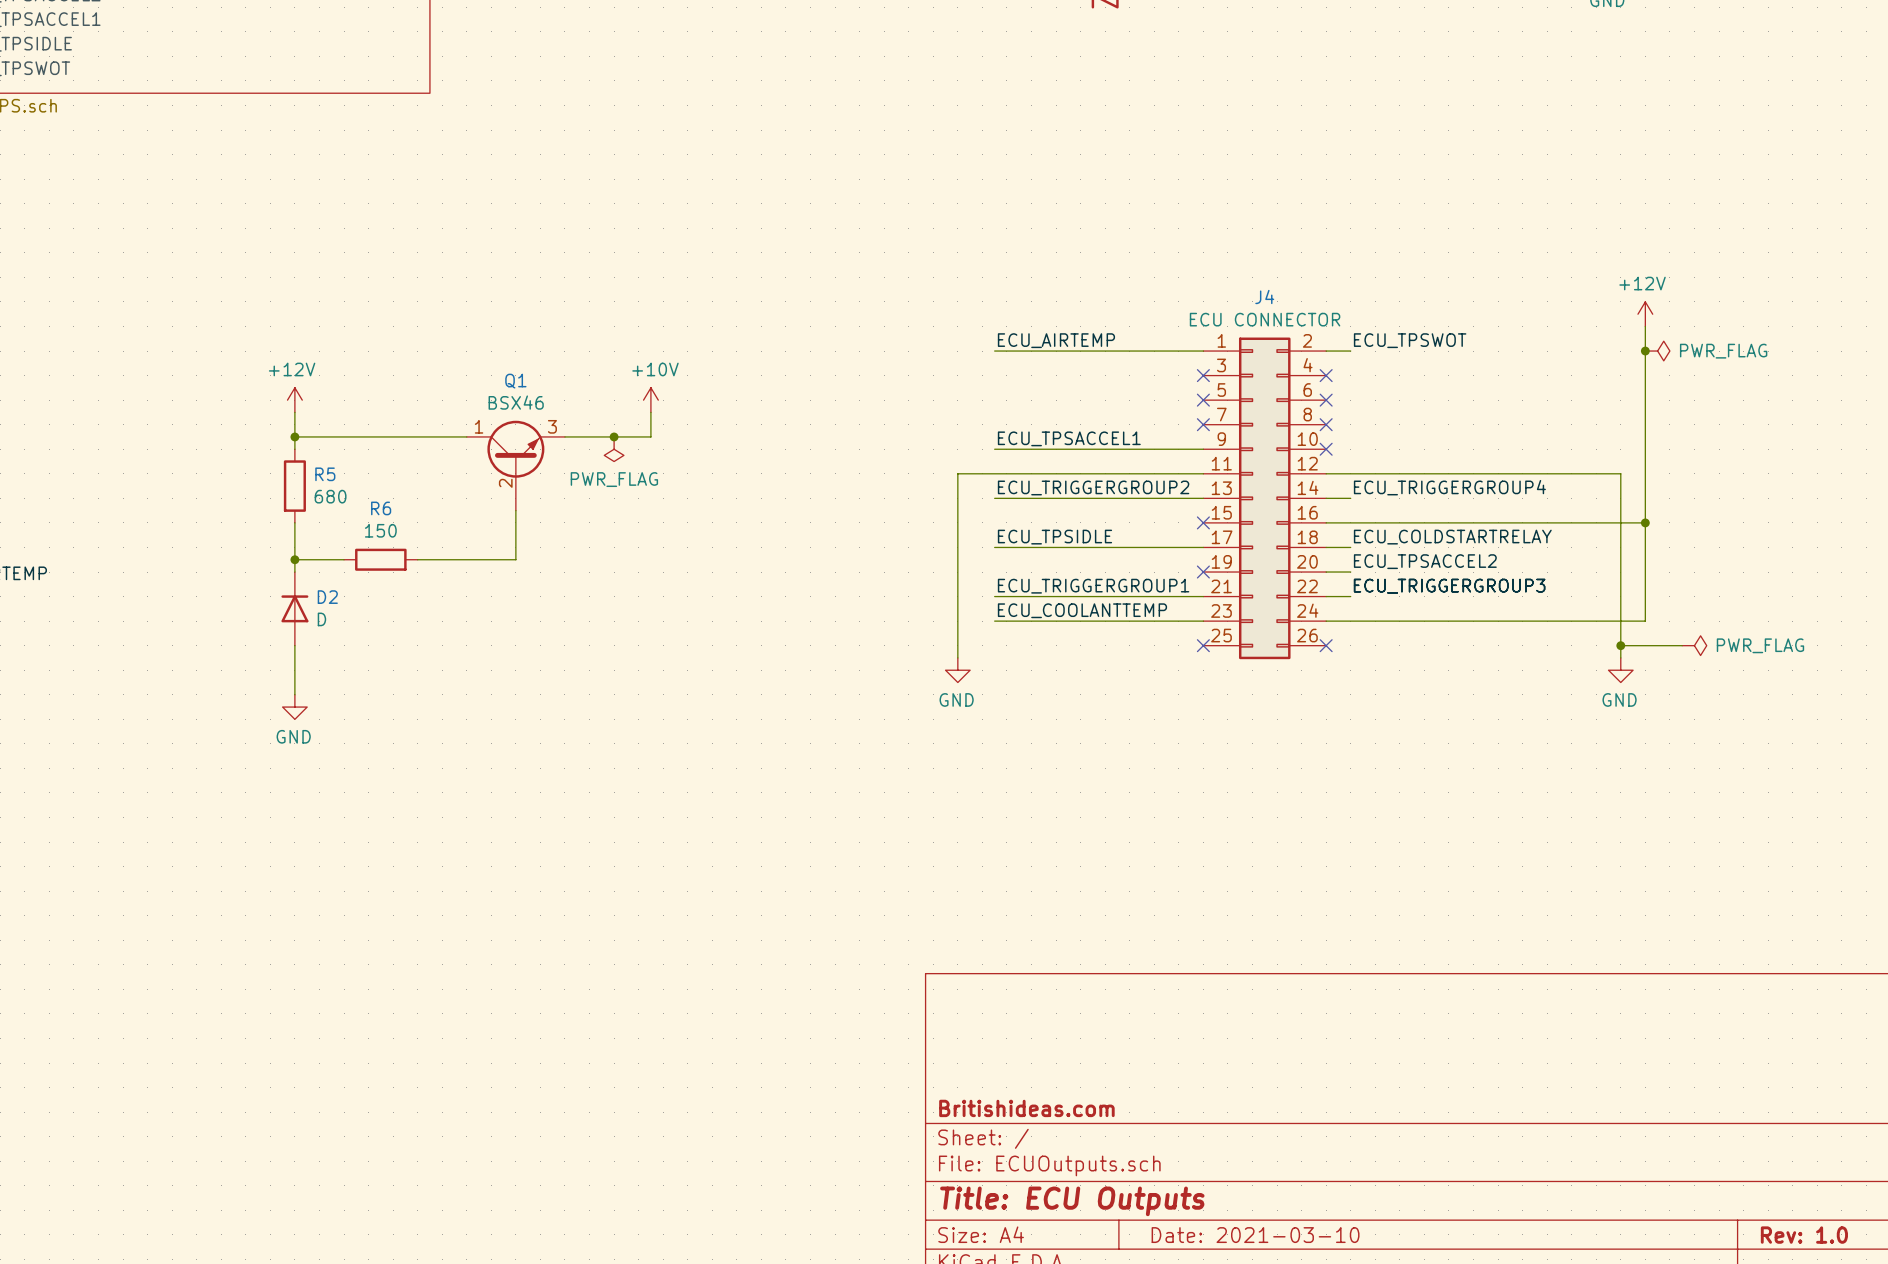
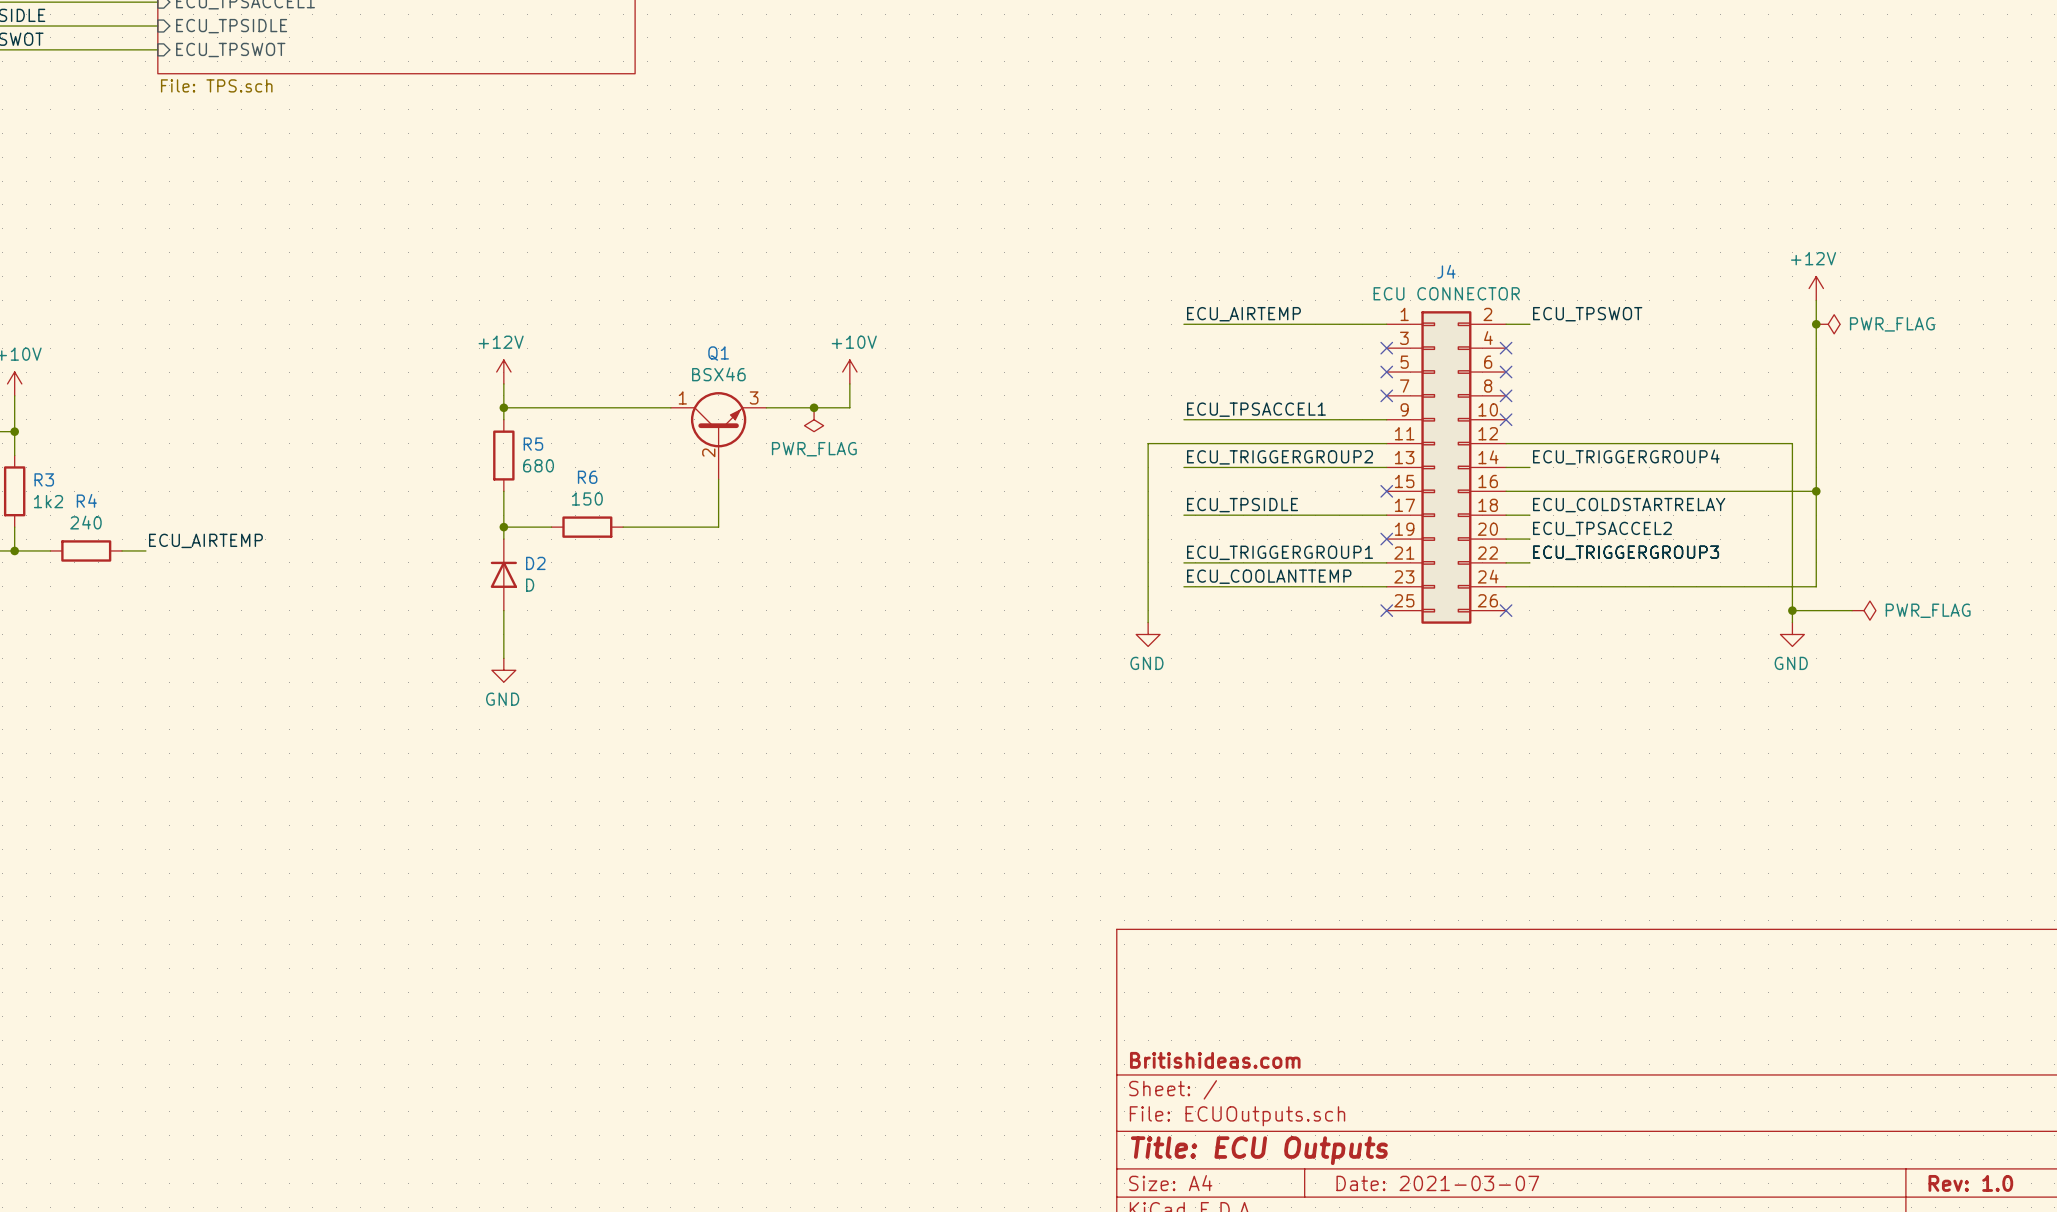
title block: Date: 2021-03-10 (1255, 1235) -> Date: 2021-03-07 (1437, 1183)

